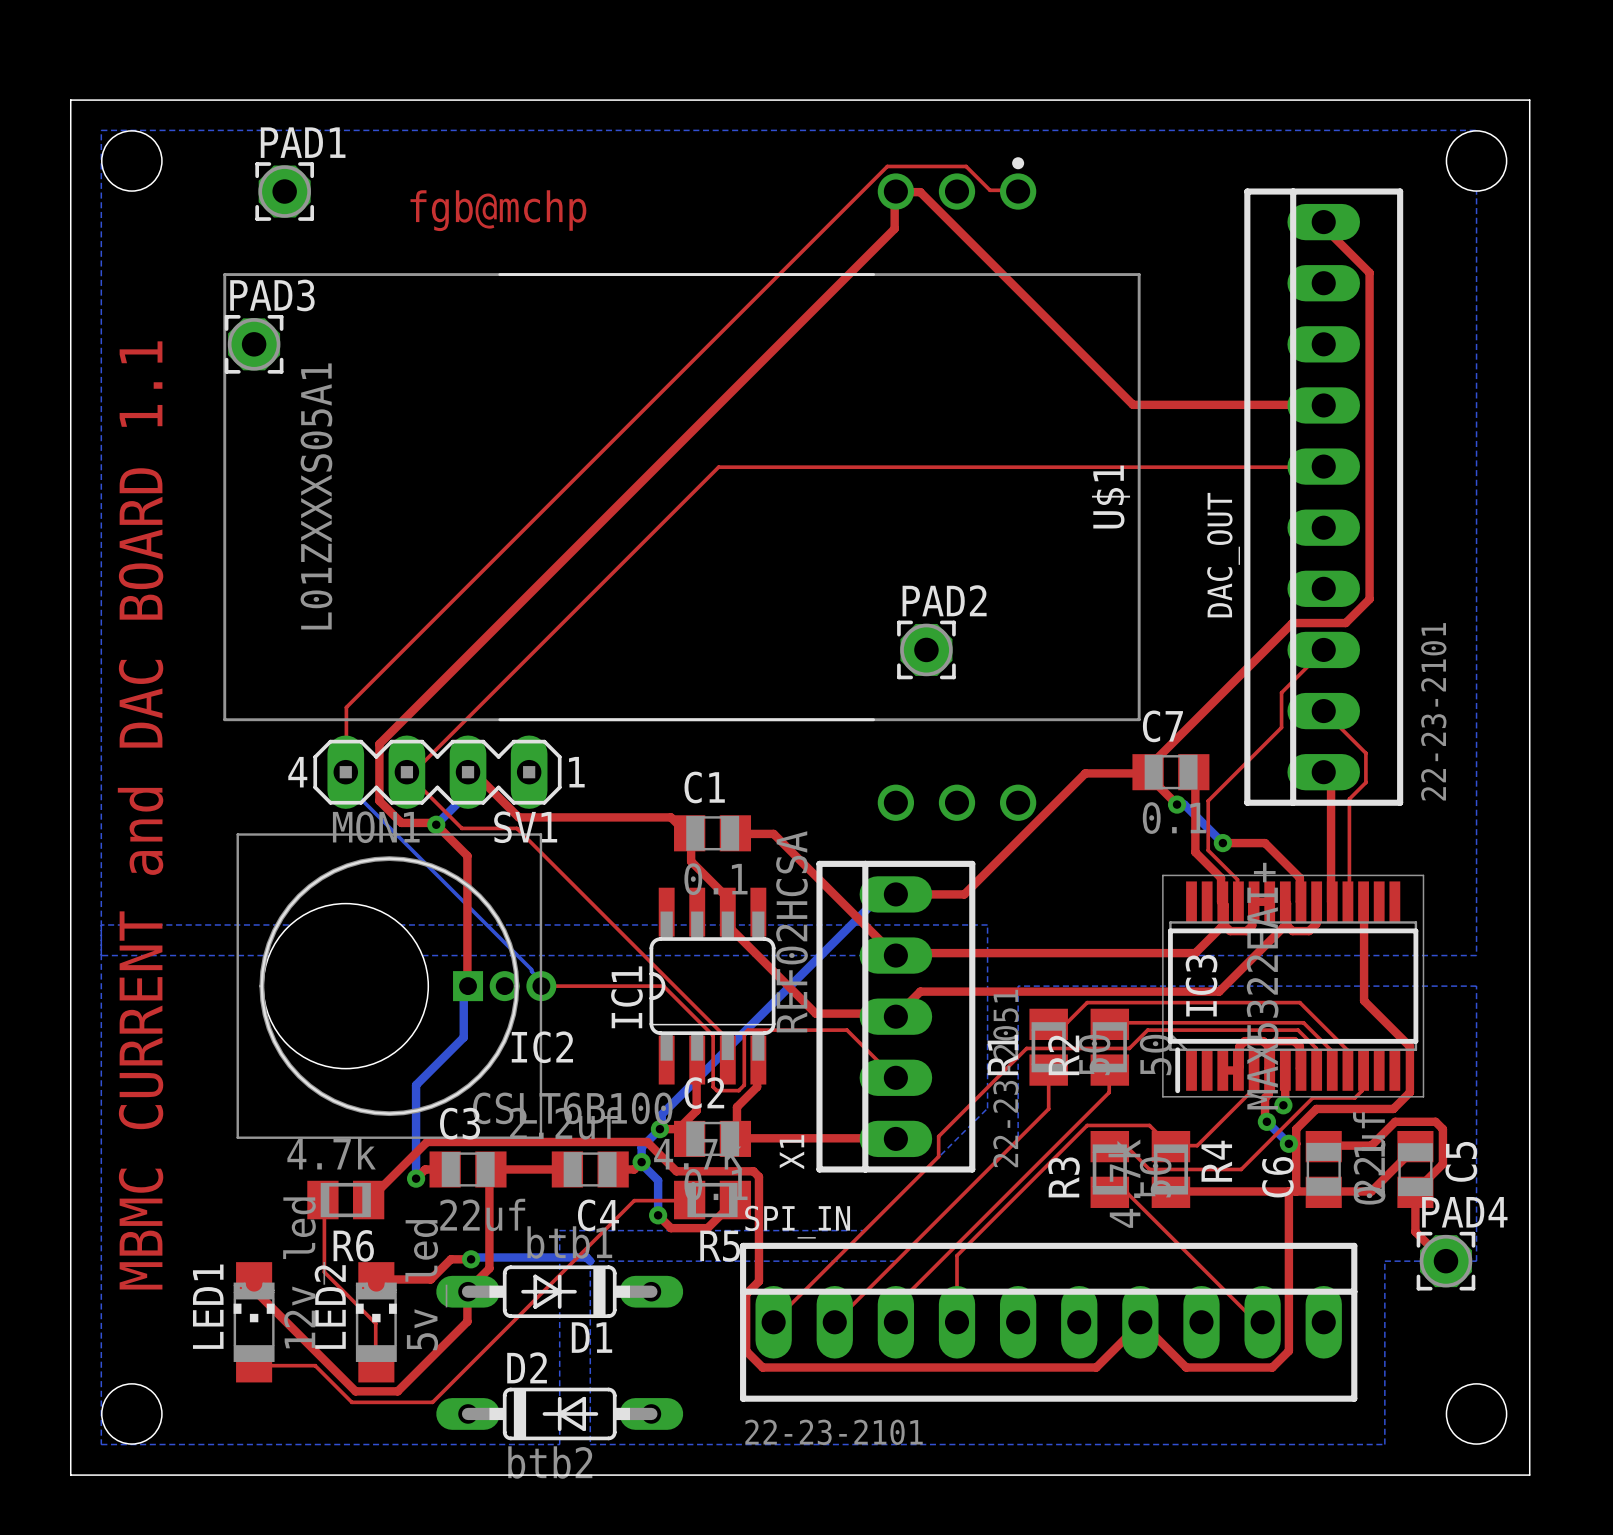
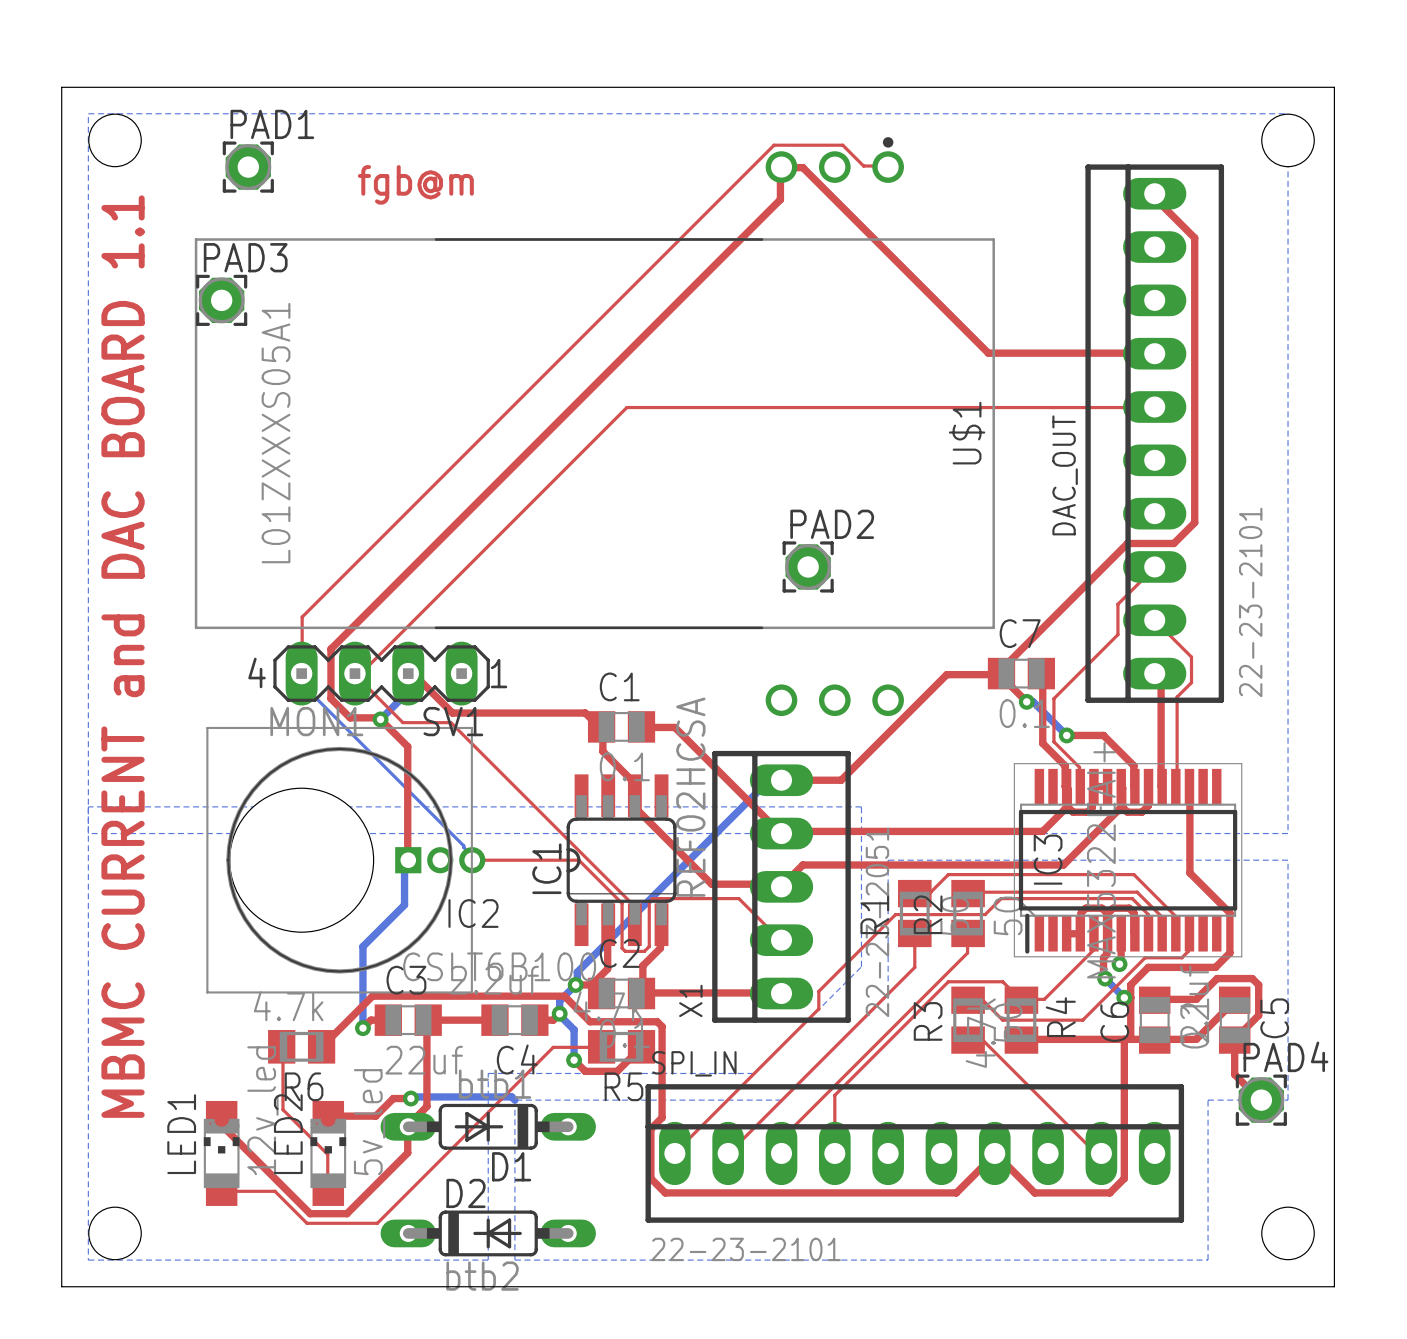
text: fgb@mchp (498, 210) -> fgb@m (415, 184)

